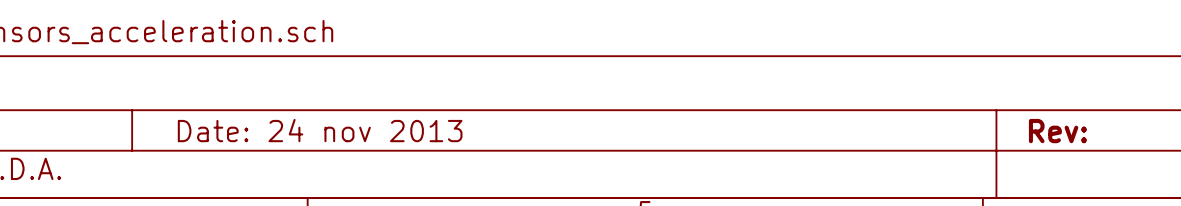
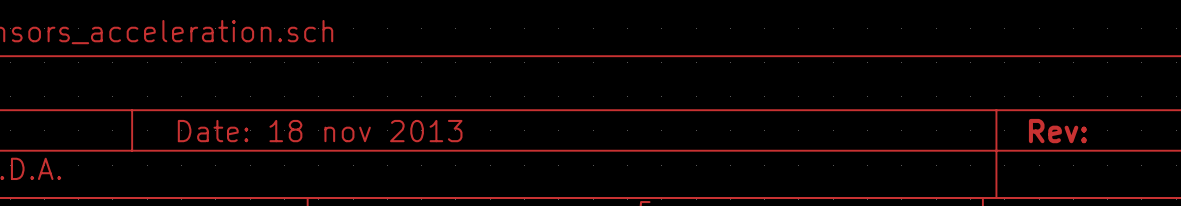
title block: Date: 24 nov 2013 (320, 130) -> Date: 18 nov 2013 (320, 131)

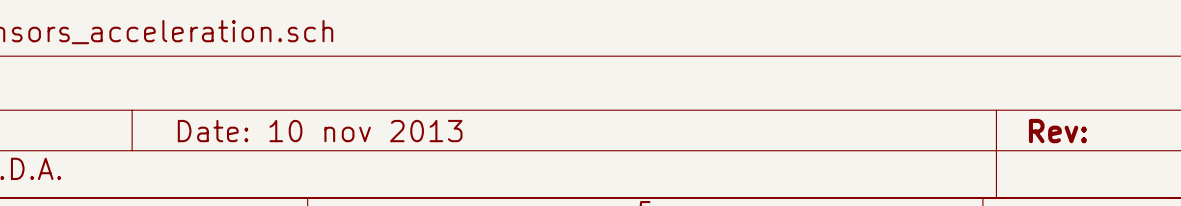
title block: Date: 18 nov 2013 (320, 131) -> Date: 10 nov 2013 (320, 131)

